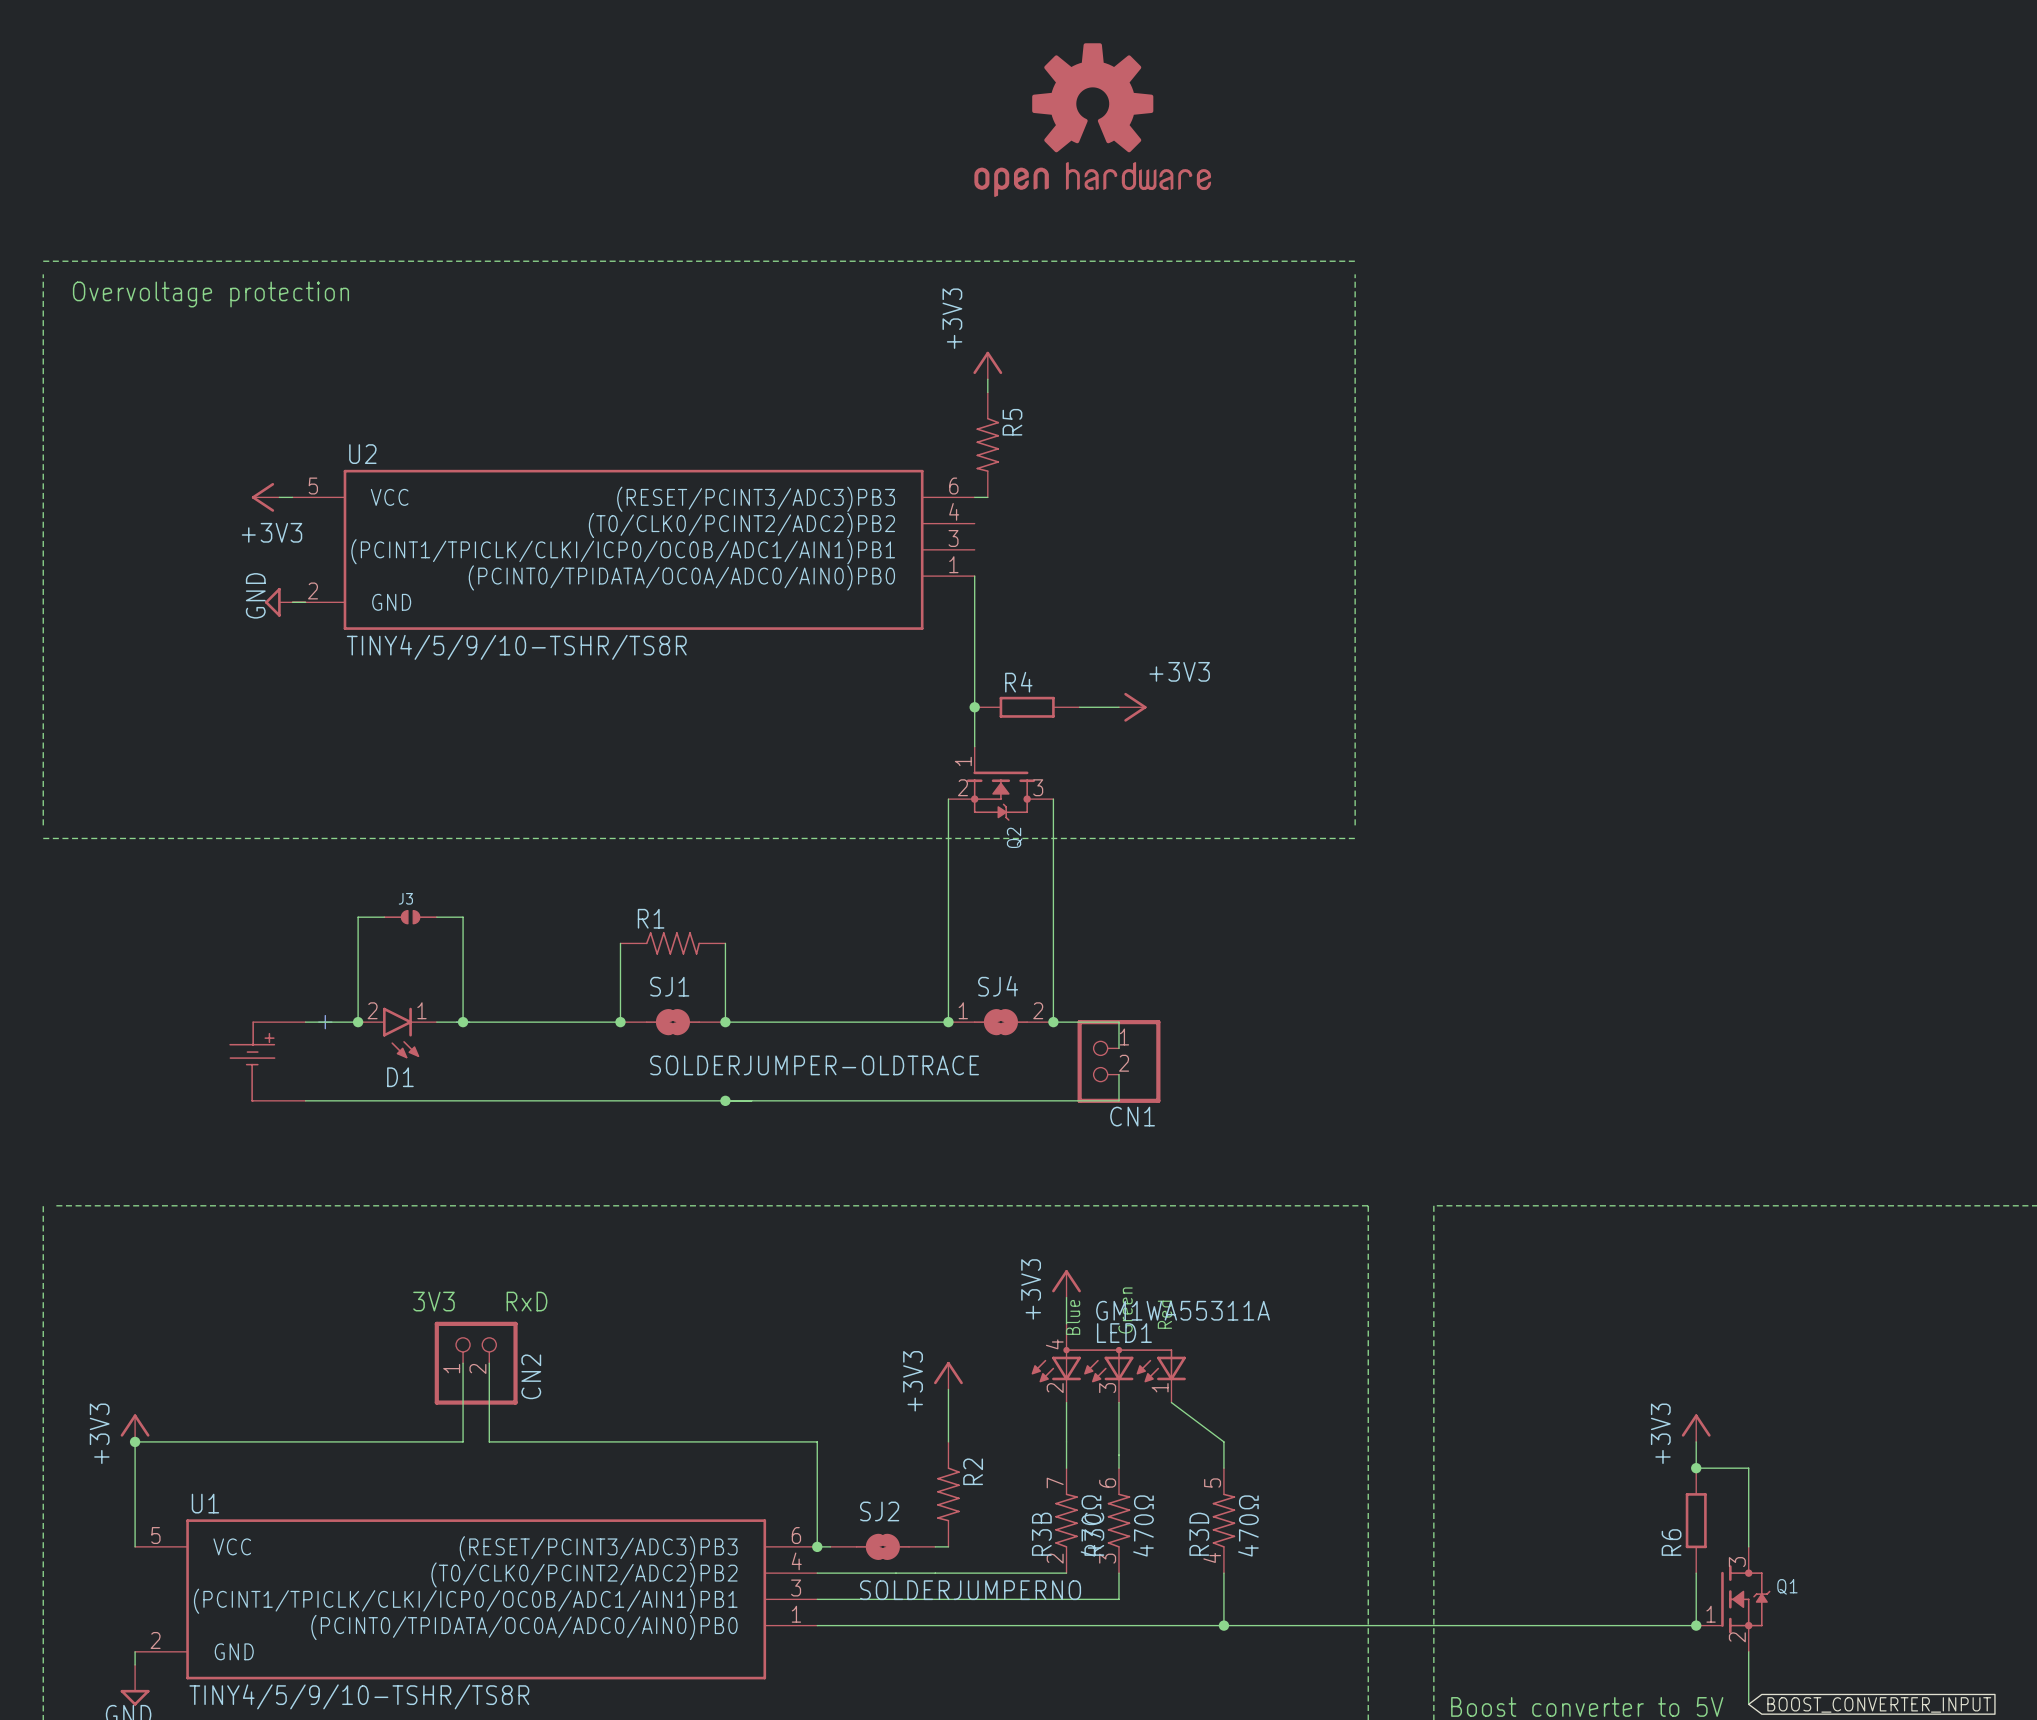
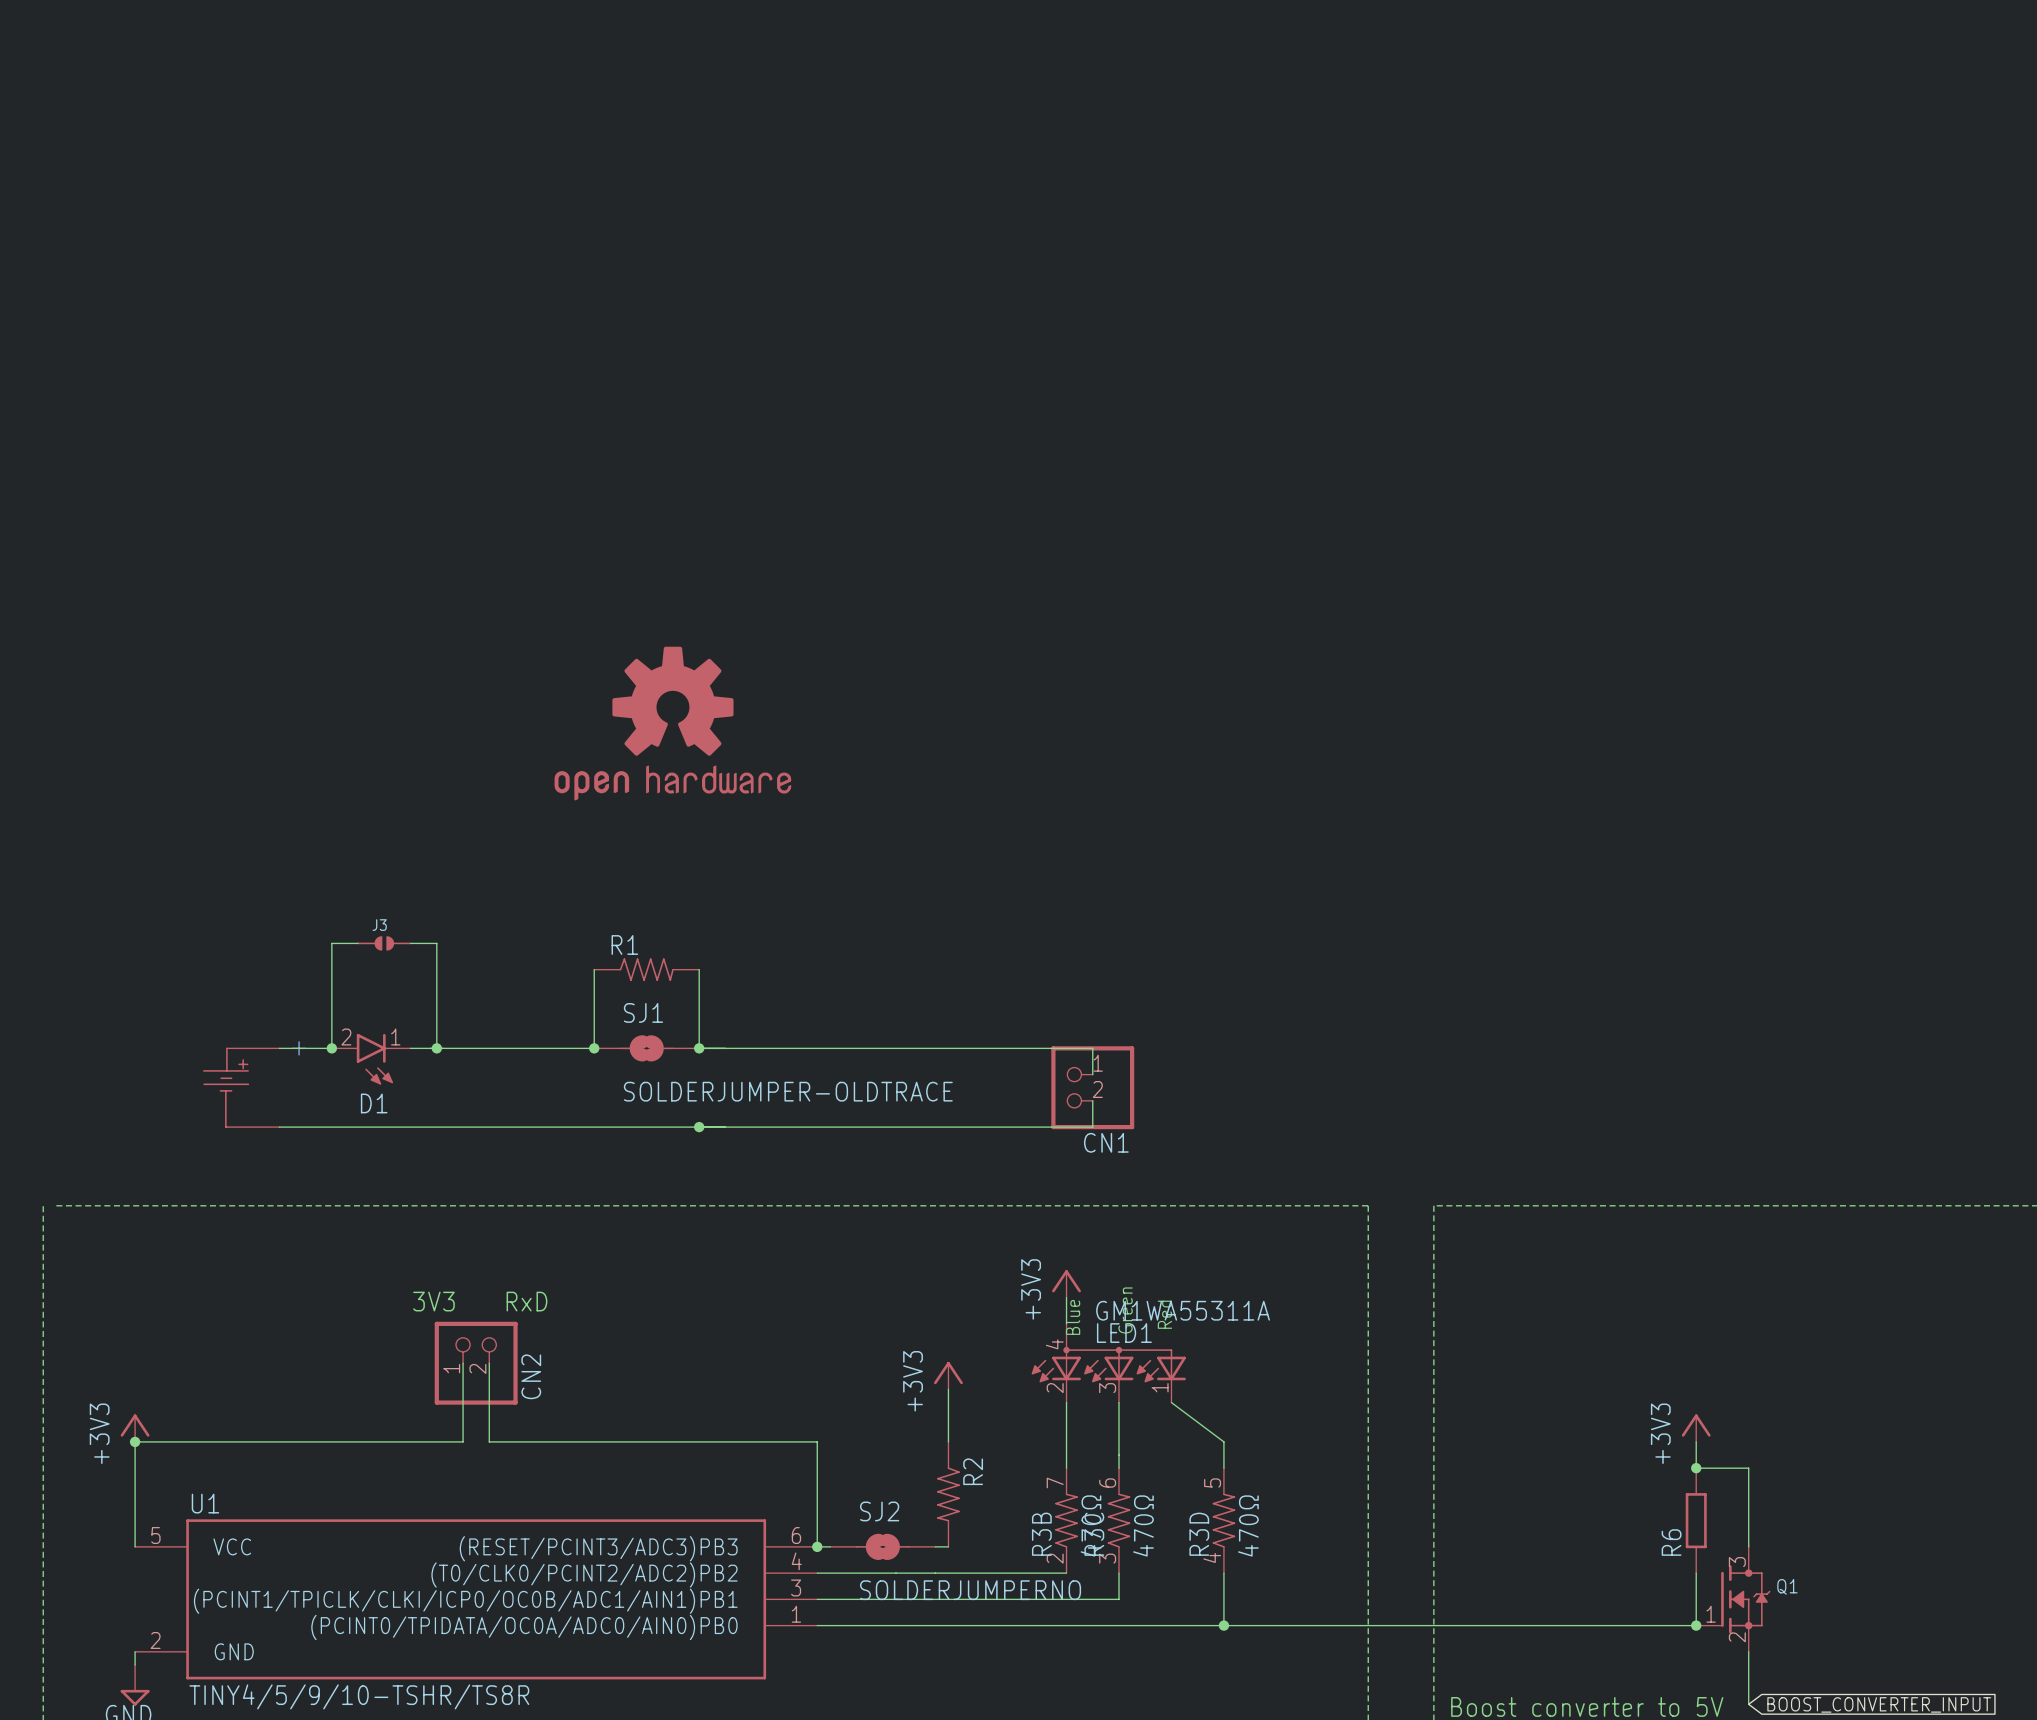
part: (1092, 120) -> none
wire: (43, 261) (1355, 261) -> none
wire: (43, 274) (43, 825) -> none
wire: (1355, 274) (1355, 825) -> none
text: Overvoltage protection (210, 294) -> none
power symbol: +3V3 (987, 365) -> none
wire: (987, 379) (987, 392) -> none
R5: (987, 444) -> none
power symbol: +3V3 (265, 497) -> none
wire: (279, 497) (292, 497) -> none
wire: (974, 497) (987, 497) -> none
U2: TINY4/5/9/10-TSHR/TS8R (633, 549) -> none
wire: (974, 576) (974, 746) -> none
power symbol: GND (285, 602) -> none
wire: (292, 602) (305, 602) -> none
junction: (974, 707) -> none
R4: (1027, 707) -> none
wire: (1079, 707) (1118, 707) -> none
power symbol: +3V3 (1132, 707) -> none
part: none -> (672, 723)
Q2: (1000, 783) -> none
wire: (948, 799) (948, 1022) (725, 1022) (725, 943) -> none
wire: (1053, 799) (1053, 1022) (1118, 1022) (1118, 1048) -> none
wire: (43, 838) (1355, 838) -> none
wire: (384, 917) (358, 917) (358, 1022) (305, 1022) -> (358, 943) (331, 943) (331, 1048) (279, 1048)
J3 position: (410, 917) -> (384, 943)
wire: (436, 917) (463, 917) (463, 1022) -> (410, 943) (436, 943) (436, 1048)
wire: (620, 943) (620, 1022) (436, 1022) -> (594, 969) (594, 1048) (410, 1048)
R1 position: (672, 943) -> (646, 969)
wire: none -> (699, 969) (699, 1048) (1092, 1048) (1092, 1074)
junction position: (358, 1022) -> (331, 1048)
junction position: (463, 1022) -> (436, 1048)
junction position: (620, 1022) -> (594, 1048)
SJ1 position: (672, 1022) -> (646, 1048)
junction: (725, 1022) -> none
junction: (948, 1022) -> none
SJ4: (1000, 1022) -> none
junction: (1053, 1022) -> none
D1 position: (394, 1033) -> (367, 1059)
junction: none -> (699, 1048)
part position: (267, 1061) -> (241, 1087)
CN1 position: (1118, 1061) -> (1092, 1087)
wire: (1118, 1074) (1118, 1100) (305, 1100) -> (1092, 1100) (1092, 1127) (279, 1127)
junction: (725, 1100) -> none
junction: none -> (699, 1127)

